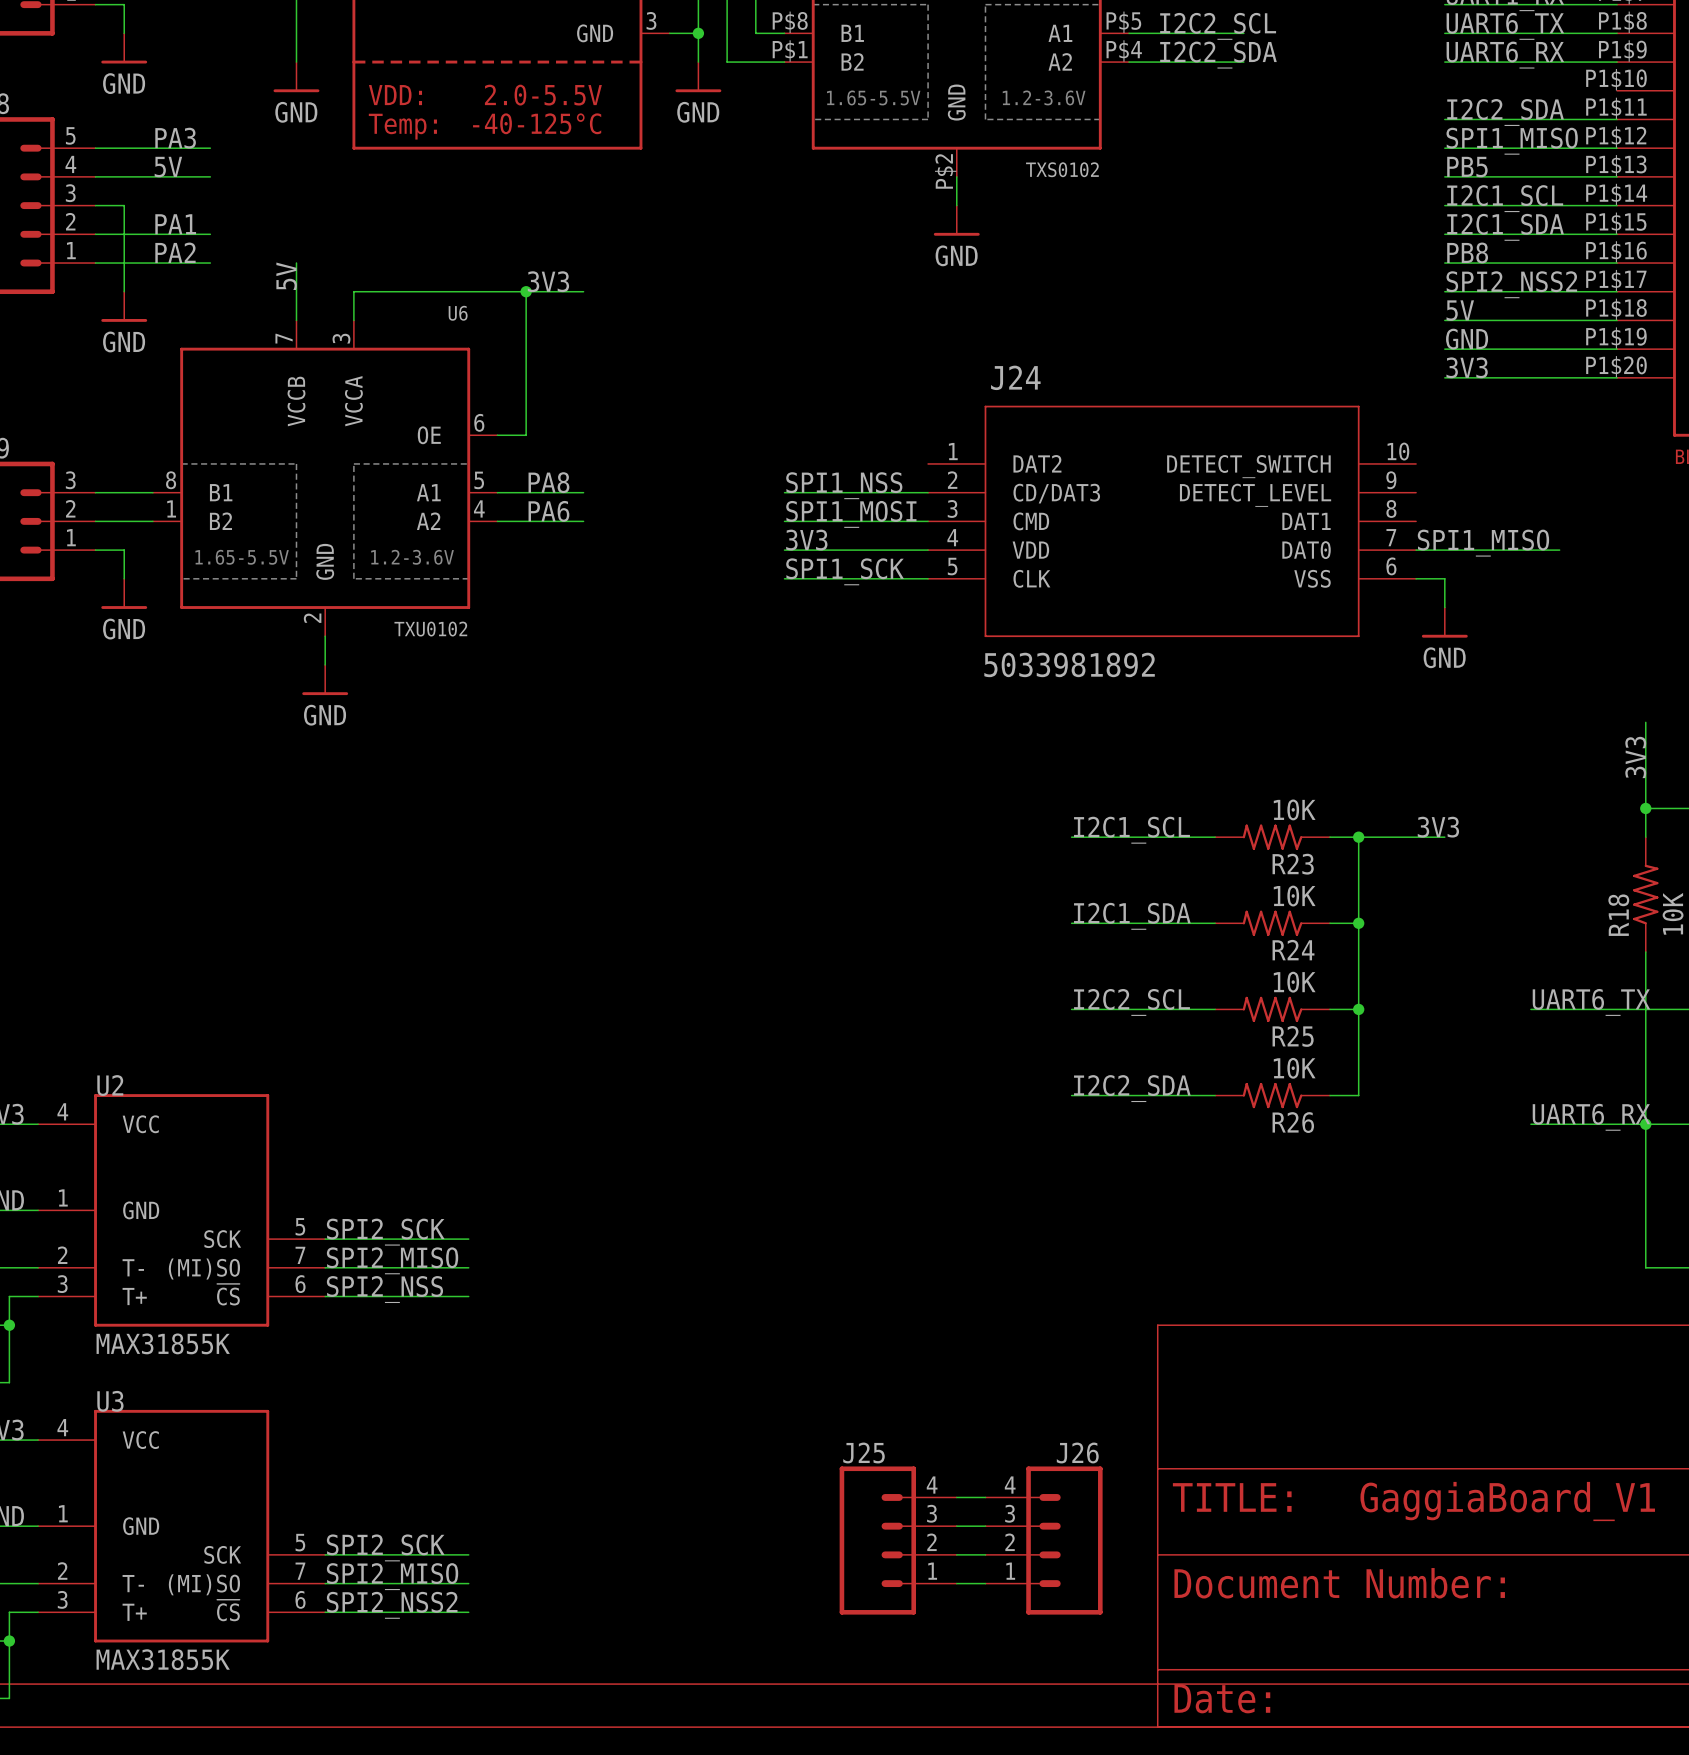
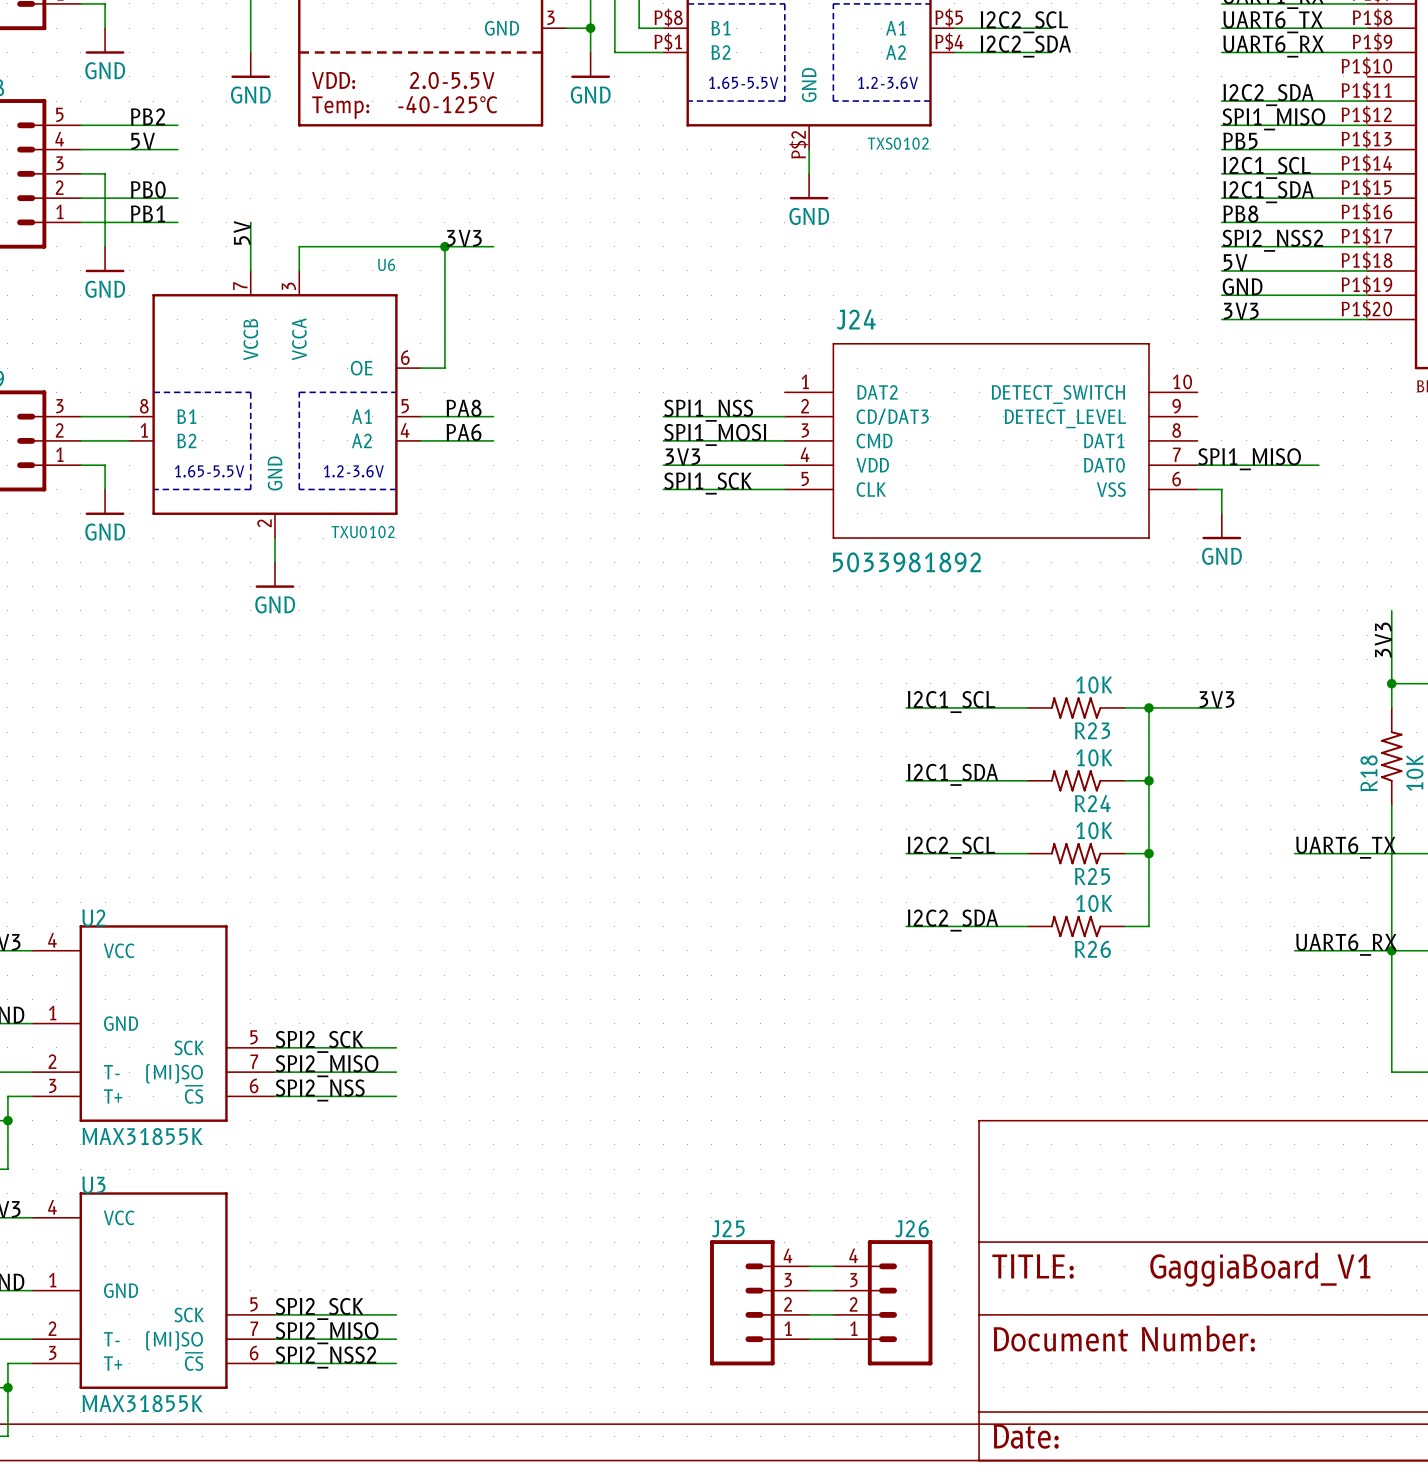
label: PA3 (175, 138) -> PB2 (148, 116)
label: PA1 (175, 224) -> PB0 (148, 189)
label: PA2 (175, 252) -> PB1 (147, 213)

